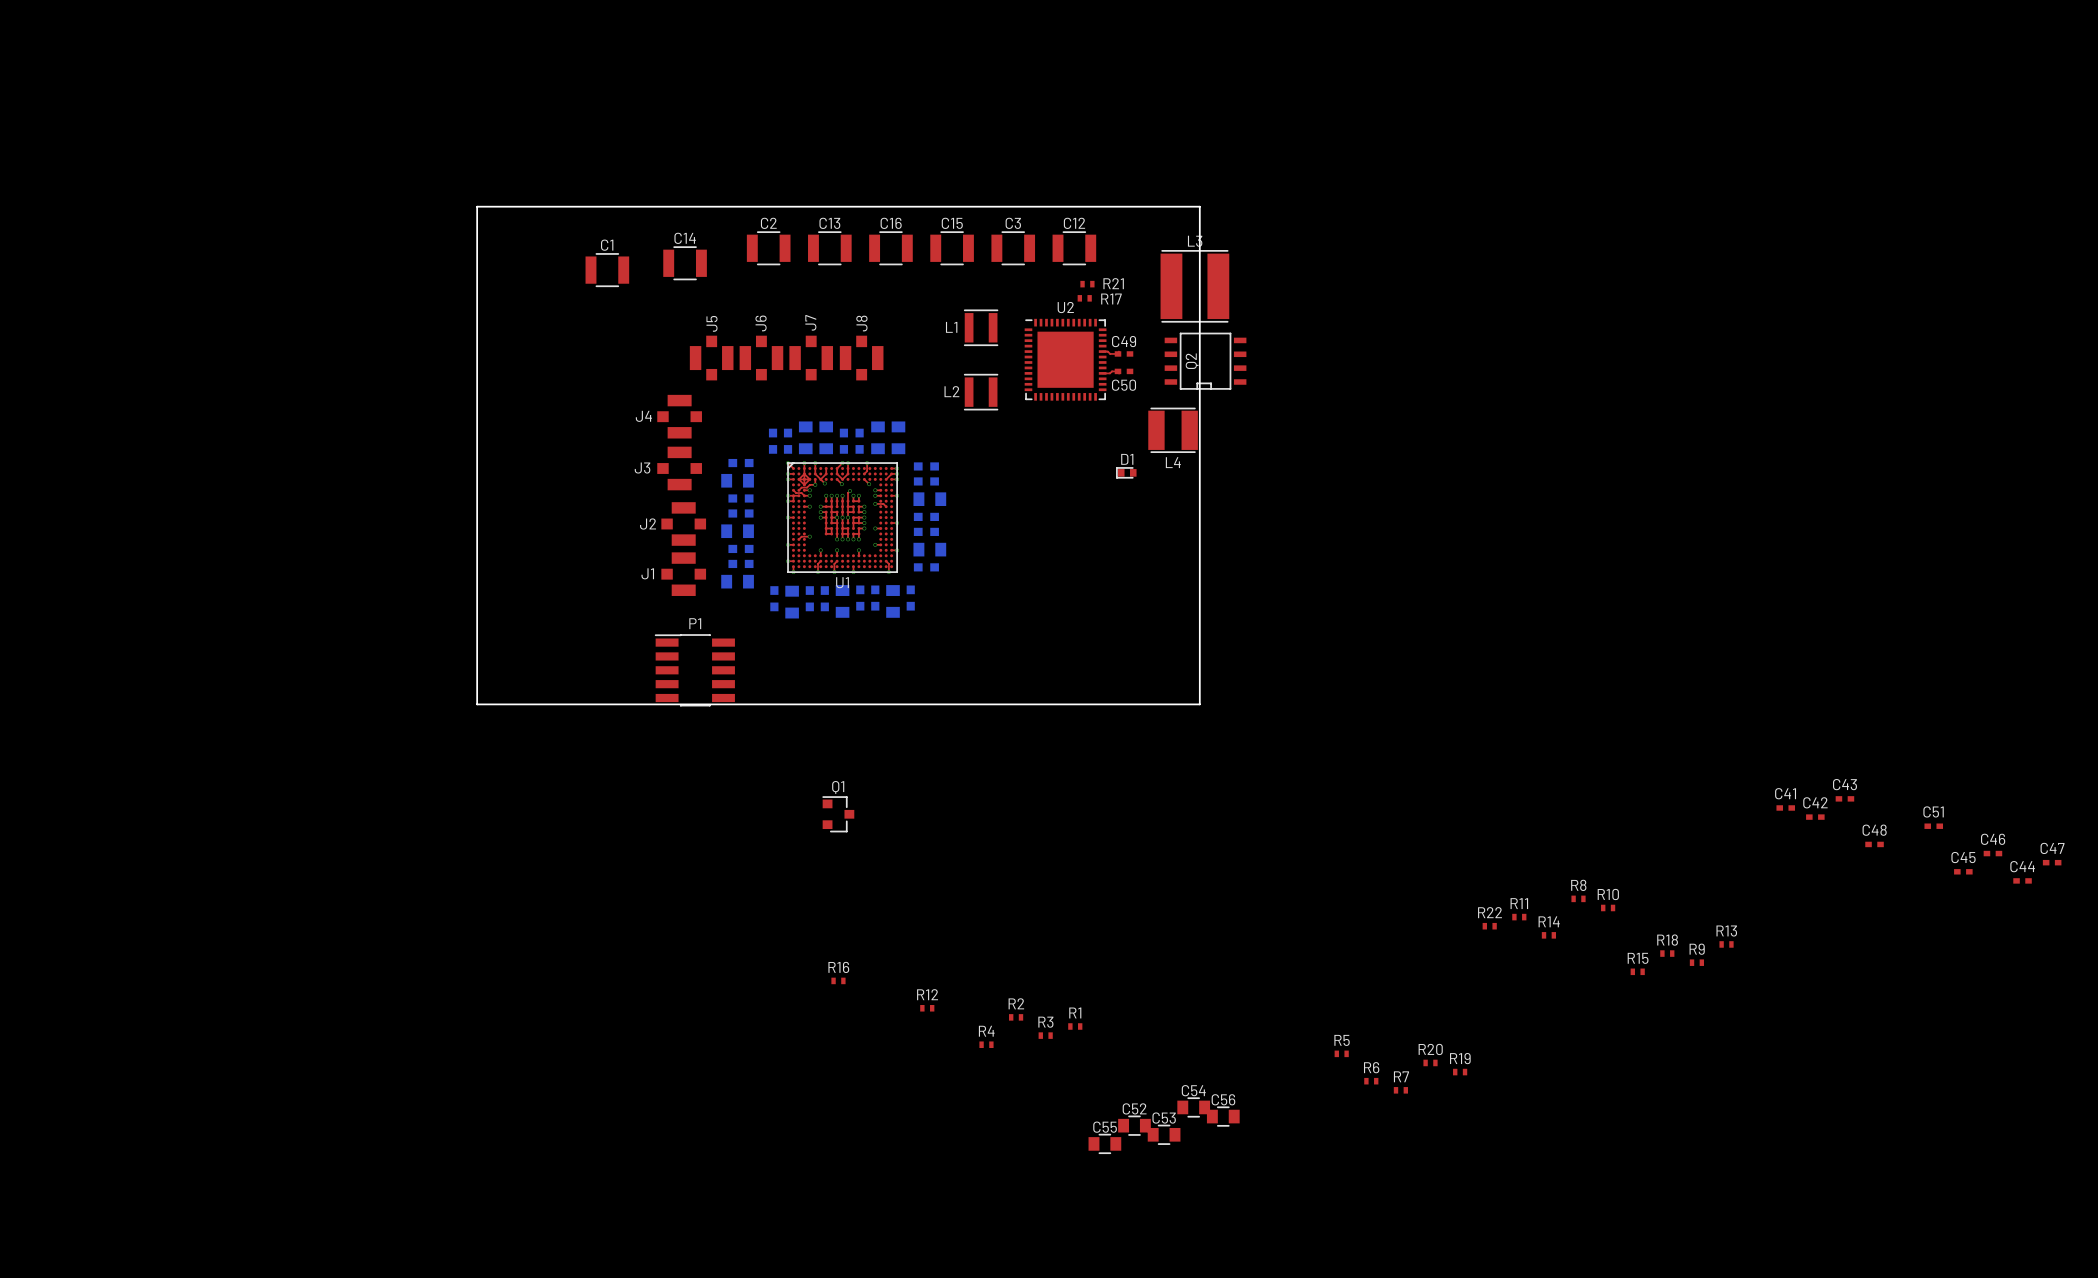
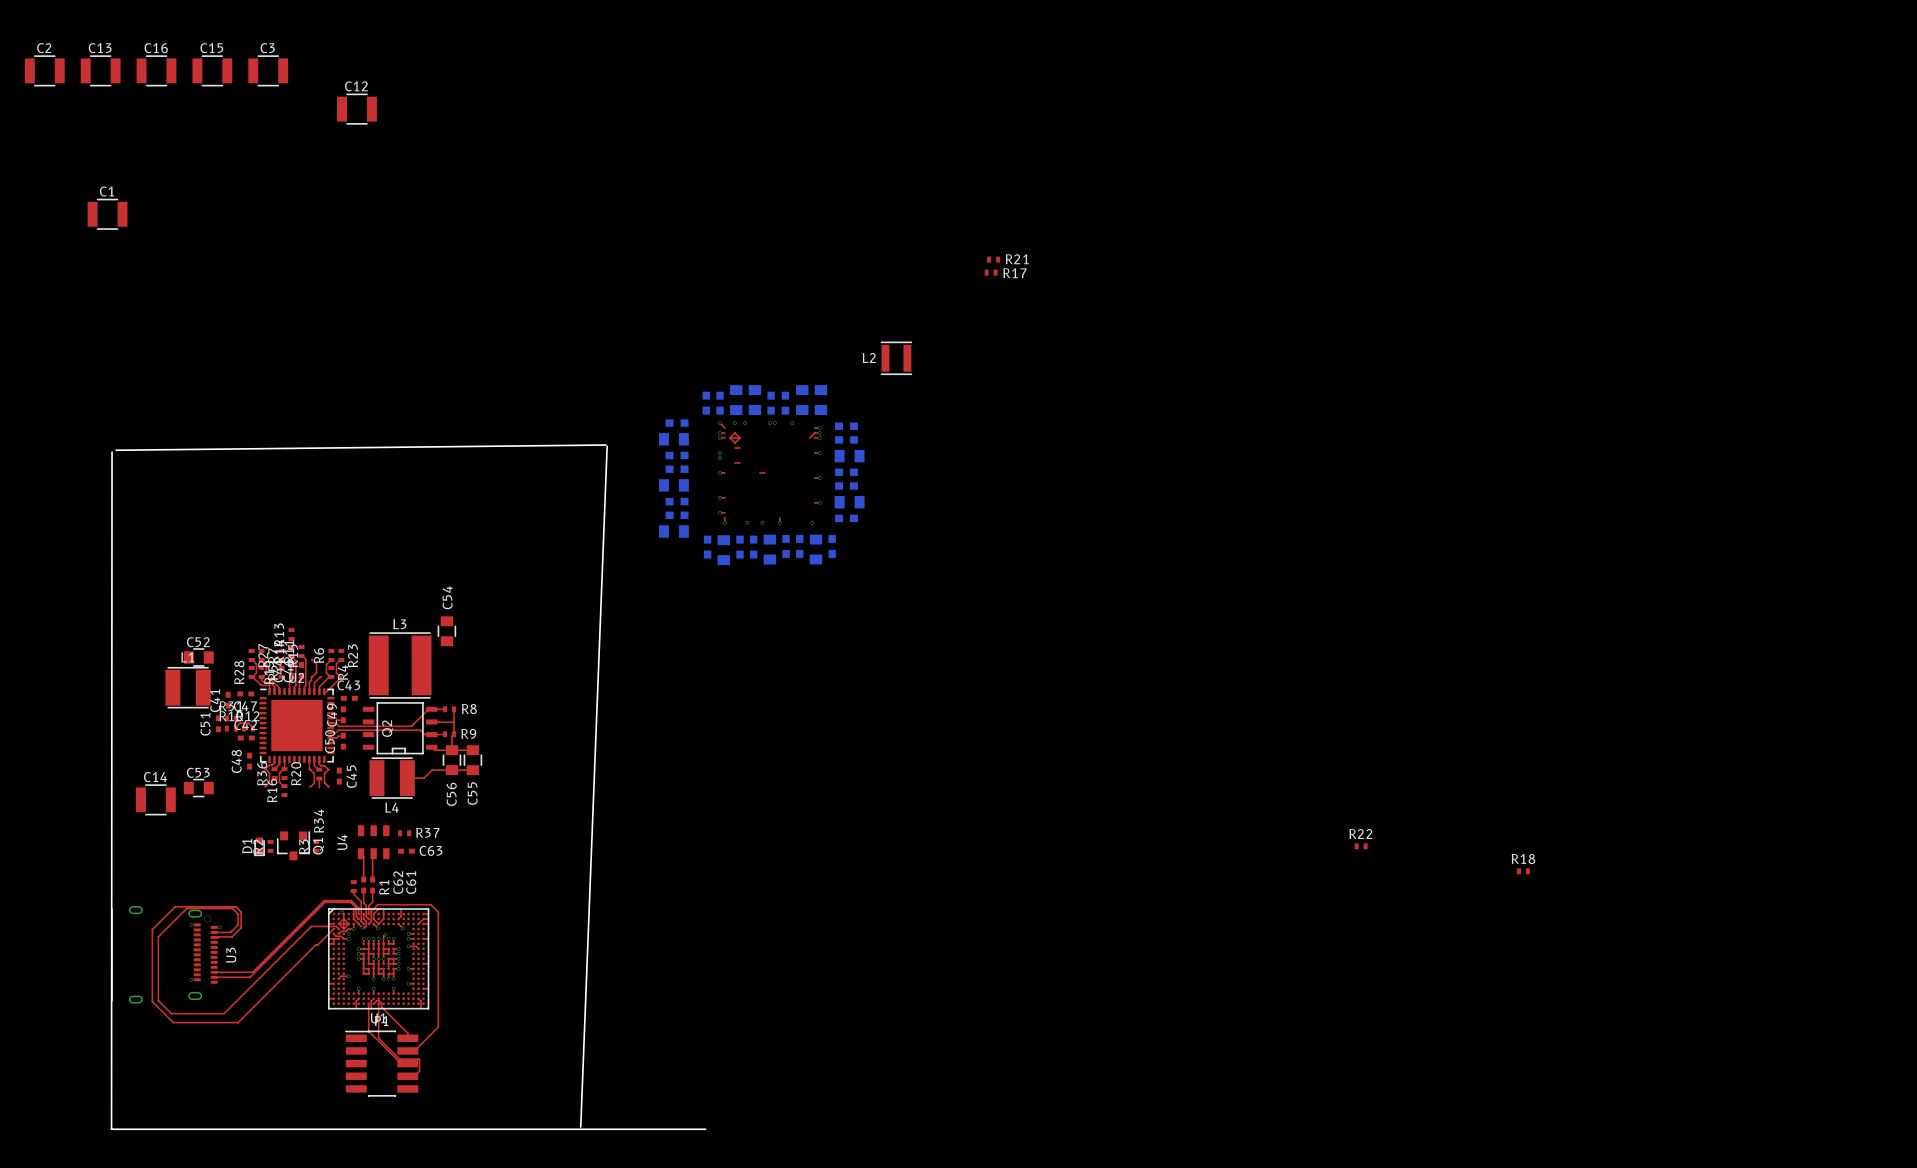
board edge: (477, 206) (1199, 206) (1199, 704) (477, 704) (477, 206) -> none
C2 position: (768, 248) -> (44, 70)
C13 position: (829, 248) -> (100, 70)
C16 position: (890, 248) -> (156, 70)
C15 position: (952, 248) -> (212, 70)
C3 position: (1013, 248) -> (268, 70)
C12 position: (1074, 248) -> (356, 109)
C14 position: (685, 263) -> (155, 799)
C1 position: (607, 270) -> (107, 214)
L3 position: (1194, 286) -> (400, 665)
L1 footprint: [963, 309, 999, 347] -> [165, 667, 211, 709]
L1 name position: L1 (951, 327) -> L1 (187, 657)
top track: (1102, 351) (1118, 353) -> none
top track: (1118, 351) (1119, 351) -> none
C49 rotation: 0° (1124, 353) -> 90° clockwise (343, 714)
C49 position: (1124, 353) -> (343, 714)
J5: (711, 358) -> none
J6: (761, 358) -> none
J7: (811, 358) -> none
J8: (861, 358) -> none
U2 position: (1065, 359) -> (296, 725)
Q2 position: (1205, 361) -> (400, 728)
top track: (1118, 371) (1102, 373) -> none
C50 rotation: 0° (1124, 371) -> 90° clockwise (343, 741)
C50 position: (1124, 371) -> (343, 741)
J4: (679, 416) -> none
L4 position: (1173, 430) -> (392, 778)
top track: (804, 463) (804, 484) -> none
top track: (815, 463) (815, 473) (824, 483) -> none
top track: (842, 463) (837, 468) (837, 473) (842, 479) (848, 473) (848, 463) -> none
top track: (867, 463) (867, 471) (864, 473) -> none
J3: (679, 468) -> none
top track: (826, 468) (826, 473) (820, 479) -> none
D1 rotation: 0° (1126, 472) -> 90° counterclockwise (259, 846)
D1 position: (1126, 472) -> (259, 846)
top track: (815, 479) (815, 484) (809, 484) (798, 490) -> none
top track: (837, 479) (841, 484) -> none
top track: (864, 479) (869, 484) -> none
via: (824, 483) -> none
via: (815, 484) -> none
via: (841, 484) -> none
via: (869, 484) -> none
board edge: none -> (605, 445) (116, 450)
board edge: none -> (607, 446) (580, 1127)
top track: (793, 490) (796, 493) (809, 495) -> none
via: (809, 490) -> none
top track: (850, 490) (848, 493) (848, 523) -> none
via: (850, 490) -> none
top track: (875, 490) (880, 490) -> none
via: (875, 490) -> none
board edge: none -> (112, 452) (111, 1129) (705, 1129)
top track: (788, 495) (798, 495) -> none
top track: (793, 495) (793, 501) (788, 501) -> none
via: (809, 495) -> none
top track: (826, 495) (826, 501) -> none
via: (826, 495) -> none
top track: (831, 495) (831, 523) (837, 523) -> none
via: (831, 495) -> none
top track: (837, 495) (837, 506) -> none
via: (837, 495) -> none
top track: (842, 495) (842, 539) -> none
via: (842, 495) -> none
top track: (853, 495) (853, 501) (858, 501) (858, 495) -> none
via: (853, 495) -> none
via: (858, 495) -> none
top track: (875, 495) (880, 495) -> none
via: (875, 495) -> none
top track: (875, 503) (883, 503) (886, 506) -> none
via: (875, 503) -> none
via: (809, 506) -> none
top track: (820, 506) (831, 506) -> none
via: (820, 506) -> none
top track: (848, 506) (853, 506) (853, 512) (848, 512) -> none
top track: (864, 506) (858, 506) (858, 512) (864, 512) -> none
via: (864, 506) -> none
top track: (820, 512) (826, 512) (826, 533) (831, 533) (831, 528) (826, 528) -> none
via: (820, 512) -> none
top track: (831, 512) (837, 512) (837, 539) -> none
via: (864, 512) -> none
top track: (820, 517) (826, 517) -> none
via: (820, 517) -> none
via: (837, 517) -> none
U1 position: (842, 517) -> (378, 958)
via: (842, 517) -> none
via: (848, 517) -> none
top track: (858, 517) (858, 523) -> none
top track: (864, 517) (853, 517) (853, 528) -> none
via: (864, 517) -> none
J2: (683, 523) -> none
top track: (853, 523) (864, 523) -> none
via: (864, 523) -> none
top track: (842, 528) (848, 528) (848, 539) -> none
top track: (864, 528) (858, 528) (858, 539) -> none
via: (864, 528) -> none
top track: (875, 528) (880, 528) -> none
via: (875, 528) -> none
top track: (842, 533) (848, 533) -> none
top track: (858, 533) (853, 533) (853, 539) -> none
top track: (809, 536) (801, 536) (798, 539) -> none
via: (809, 536) -> none
via: (837, 539) -> none
via: (842, 539) -> none
via: (848, 539) -> none
via: (853, 539) -> none
via: (858, 539) -> none
top track: (875, 544) (880, 544) -> none
via: (875, 544) -> none
top track: (820, 550) (820, 555) -> none
via: (820, 550) -> none
top track: (837, 550) (837, 555) -> none
via: (837, 550) -> none
top track: (858, 550) (858, 555) -> none
via: (858, 550) -> none
top track: (820, 561) (818, 563) (818, 572) -> none
top track: (837, 561) (834, 563) (834, 572) -> none
top track: (886, 561) (888, 563) (888, 572) -> none
J1: (683, 574) -> none
P1 position: (694, 670) -> (381, 1063)
R27: none -> (251, 655)
top track: none -> (291, 655) (295, 660) (294, 691)
top track: none -> (301, 655) (305, 659) (304, 691)
R23: none -> (341, 655)
top track: none -> (251, 659) (256, 664) (256, 673) (252, 676)
top track: none -> (261, 659) (266, 663) (266, 673) (261, 676) (261, 680) (263, 682) (270, 682) (274, 686) (274, 691)
top track: none -> (311, 659) (316, 664) (316, 672) (311, 676) (309, 682) (309, 691)
top track: none -> (331, 659) (326, 664) (326, 673) (330, 676)
top track: none -> (341, 659) (336, 663) (336, 673) (341, 677) (326, 691) (324, 691)
R28: none -> (251, 672)
top track: none -> (291, 675) (289, 691)
top track: none -> (301, 675) (299, 691)
top track: none -> (252, 676) (261, 685) (269, 685) (269, 691)
top track: none -> (271, 676) (271, 680) (279, 688) (279, 691)
top track: none -> (321, 676) (314, 682) (314, 691)
top track: none -> (331, 676) (319, 686) (319, 691)
top track: none -> (453, 708) (451, 750)
top track: none -> (444, 709) (428, 709) (411, 726) (338, 726) (335, 723) (330, 723)
top track: none -> (330, 718) (343, 720)
R31: none -> (231, 718)
top track: none -> (431, 721) (453, 722)
top track: none -> (235, 728) (240, 723) (248, 723) (252, 728)
C43 position: (1844, 798) -> (349, 698)
top track: none -> (330, 733) (335, 733) (338, 730) (420, 730) (424, 734) (445, 734)
top track: none -> (343, 736) (330, 738)
C41 rotation: 0° (1785, 807) -> 90° clockwise (228, 700)
C41 position: (1785, 807) -> (228, 700)
Q1 rotation: 0° (838, 814) -> 90° clockwise (293, 845)
Q1 position: (838, 814) -> (293, 845)
top track: none -> (431, 747) (434, 750) (472, 750)
C42 position: (1815, 817) -> (246, 738)
C51 rotation: 0° (1933, 826) -> 90° clockwise (218, 723)
C51 position: (1933, 826) -> (218, 723)
top track: none -> (274, 759) (271, 765) (264, 769)
top track: none -> (279, 759) (279, 764) (274, 769)
top track: none -> (284, 759) (284, 769) (279, 773) (279, 781) (284, 786)
top track: none -> (309, 759) (309, 769) (314, 773) (314, 783) (309, 786)
top track: none -> (314, 759) (314, 765) (319, 769)
top track: none -> (319, 759) (319, 764) (328, 769)
top track: none -> (264, 769) (269, 772) (269, 782) (264, 786)
top track: none -> (328, 769) (329, 769)
top track: none -> (328, 769) (324, 773) (324, 782) (329, 786)
top track: none -> (472, 770) (432, 770) (424, 778) (407, 778)
C48 rotation: 0° (1874, 844) -> 90° clockwise (249, 761)
C48 position: (1874, 844) -> (249, 761)
R36: none -> (274, 773)
R34: none -> (319, 774)
C47 name position: C47 (2052, 848) -> C47 (245, 706)
top track: none -> (319, 778) (319, 787)
C46 rotation: 0° (1992, 853) -> 90° clockwise (301, 670)
C46 position: (1992, 853) -> (301, 670)
C47 position: (2052, 862) -> (245, 693)
C45 rotation: 0° (1963, 871) -> 90° clockwise (339, 776)
C45 position: (1963, 871) -> (339, 776)
C44 rotation: 0° (2022, 880) -> 90° clockwise (291, 670)
C44 position: (2022, 880) -> (291, 670)
R8 name position: R8 (1578, 885) -> R8 (469, 709)
R8 position: (1578, 898) -> (449, 709)
R10 position: (1608, 907) -> (231, 728)
R37: none -> (404, 833)
R11 rotation: 0° (1519, 917) -> 90° clockwise (301, 651)
R11 position: (1519, 917) -> (301, 651)
U4: none -> (373, 842)
C63: none -> (406, 851)
top track: none -> (361, 853) (363, 856) (363, 879)
top track: none -> (373, 853) (372, 879)
R14 rotation: 0° (1548, 935) -> 90° clockwise (291, 651)
R14 position: (1548, 935) -> (291, 651)
R13 rotation: 0° (1726, 944) -> 90° clockwise (291, 634)
R13 position: (1726, 944) -> (291, 634)
R9 name position: R9 (1697, 949) -> R9 (468, 733)
R9 position: (1696, 962) -> (449, 734)
C62: none -> (363, 885)
C61: none -> (372, 885)
R15 rotation: 0° (1637, 971) -> 90° clockwise (281, 655)
R15 position: (1637, 971) -> (281, 655)
top track: none -> (363, 890) (363, 903) (366, 905) (366, 916) (368, 918)
top track: none -> (372, 890) (372, 902) (368, 906) (368, 913)
top track: none -> (353, 891) (353, 894) (361, 901) (361, 921) (363, 923)
R16 rotation: 0° (838, 980) -> 90° clockwise (284, 790)
R16 position: (838, 980) -> (284, 790)
top track: none -> (352, 908) (353, 918) (362, 927) (364, 927) (366, 921) (363, 918) (363, 913)
top track: none -> (378, 908) (373, 913) (373, 918) (378, 923) (383, 918) (383, 908)
top track: none -> (401, 908) (401, 916) (398, 918)
top track: none -> (342, 912) (343, 928)
via: none -> (342, 912)
top track: none -> (358, 913) (358, 907) (351, 900) (324, 900) (252, 972) (214, 972)
top track: none -> (423, 913) (428, 913)
top track: none -> (358, 918) (356, 916) (356, 907) (350, 902) (325, 902) (250, 977) (214, 977)
top track: none -> (428, 918) (423, 918) (418, 923)
R12 position: (927, 1008) -> (248, 728)
top track: none -> (328, 923) (333, 923)
top track: none -> (338, 923) (348, 923)
top track: none -> (338, 923) (343, 918) (348, 923)
top track: none -> (338, 923) (343, 928)
top track: none -> (348, 923) (343, 928)
top track: none -> (353, 923) (353, 928) (348, 928) (338, 933)
top track: none -> (368, 923) (371, 921) (371, 911) (377, 904) (430, 904) (438, 912) (438, 1027) (414, 1050) (407, 1050)
top track: none -> (373, 923) (378, 928)
top track: none -> (398, 923) (402, 928)
top track: none -> (423, 923) (428, 923)
via: none -> (191, 924)
via: none -> (219, 927)
via: none -> (362, 927)
via: none -> (378, 928)
via: none -> (402, 928)
top track: none -> (333, 928) (238, 1022) (173, 1022) (152, 1001) (152, 929) (175, 906) (235, 906) (241, 911) (241, 927) (232, 936) (214, 937)
top track: none -> (338, 928) (336, 926) (311, 926) (224, 1013) (171, 1013) (158, 1000) (158, 936) (186, 908) (232, 908) (238, 913) (238, 924) (230, 932) (214, 932)
via: none -> (353, 928)
R2 rotation: 0° (1016, 1017) -> 90° clockwise (270, 846)
R2 position: (1016, 1017) -> (270, 846)
top track: none -> (333, 933) (336, 936) (348, 938)
via: none -> (348, 933)
top track: none -> (385, 934) (383, 936) (383, 963)
via: none -> (385, 934)
top track: none -> (408, 933) (413, 933)
via: none -> (408, 933)
R1 rotation: 0° (1075, 1026) -> 90° clockwise (353, 886)
R1 position: (1075, 1026) -> (353, 886)
top track: none -> (328, 938) (338, 938)
top track: none -> (333, 938) (333, 943) (328, 943)
via: none -> (348, 938)
top track: none -> (363, 938) (363, 943)
via: none -> (363, 938)
top track: none -> (368, 938) (368, 963) (373, 963)
via: none -> (368, 938)
top track: none -> (373, 938) (373, 948)
via: none -> (373, 938)
top track: none -> (378, 938) (378, 973) (383, 973)
via: none -> (378, 938)
top track: none -> (388, 938) (388, 943) (393, 943) (393, 938)
via: none -> (388, 938)
via: none -> (393, 938)
top track: none -> (408, 938) (413, 938)
via: none -> (408, 938)
top track: none -> (423, 938) (428, 938)
top track: none -> (408, 946) (416, 946) (418, 948)
via: none -> (408, 946)
R3 rotation: 0° (1045, 1035) -> 90° clockwise (316, 846)
R3 position: (1045, 1035) -> (316, 846)
top track: none -> (358, 948) (368, 948)
via: none -> (358, 948)
top track: none -> (383, 948) (388, 948) (388, 953) (383, 953)
top track: none -> (398, 948) (393, 948) (393, 953) (398, 953)
via: none -> (398, 948)
top track: none -> (358, 953) (363, 953) (363, 973) (368, 973) (368, 968) (363, 968)
via: none -> (358, 953)
top track: none -> (368, 953) (373, 953) (373, 978)
via: none -> (398, 953)
R4 rotation: 0° (986, 1044) -> 90° clockwise (331, 672)
R4 position: (986, 1044) -> (331, 672)
U3: none -> (164, 954)
top track: none -> (328, 958) (333, 958)
top track: none -> (358, 958) (363, 958)
via: none -> (358, 958)
via: none -> (373, 958)
via: none -> (378, 958)
via: none -> (383, 958)
top track: none -> (393, 958) (393, 963)
top track: none -> (398, 958) (388, 958) (388, 968)
via: none -> (398, 958)
R5 rotation: 0° (1341, 1053) -> 90° clockwise (261, 672)
R5 position: (1341, 1053) -> (261, 672)
top track: none -> (388, 963) (398, 963)
via: none -> (398, 963)
top track: none -> (423, 963) (428, 963)
top track: none -> (378, 968) (383, 968) (383, 978)
top track: none -> (398, 968) (393, 968) (393, 978)
via: none -> (398, 968)
top track: none -> (408, 968) (413, 968)
via: none -> (408, 968)
R20 rotation: 0° (1430, 1062) -> 90° clockwise (284, 773)
R20 position: (1430, 1062) -> (284, 773)
top track: none -> (393, 973) (388, 973) (388, 978)
top track: none -> (348, 976) (341, 976) (338, 978)
via: none -> (348, 976)
via: none -> (373, 978)
via: none -> (383, 978)
via: none -> (388, 978)
via: none -> (393, 978)
via: none -> (191, 979)
R19 rotation: 0° (1460, 1072) -> 90° clockwise (281, 672)
R19 position: (1460, 1072) -> (281, 672)
top track: none -> (328, 983) (333, 983)
top track: none -> (408, 983) (413, 983)
via: none -> (408, 983)
R6 rotation: 0° (1371, 1081) -> 90° clockwise (331, 655)
R6 position: (1371, 1081) -> (331, 655)
top track: none -> (358, 988) (358, 993)
via: none -> (358, 988)
top track: none -> (373, 988) (373, 993)
via: none -> (373, 988)
top track: none -> (393, 988) (393, 993)
via: none -> (393, 988)
top track: none -> (423, 988) (428, 988)
R7 rotation: 0° (1400, 1090) -> 90° clockwise (261, 655)
R7 position: (1400, 1090) -> (261, 655)
top track: none -> (328, 998) (333, 998)
top track: none -> (358, 998) (356, 1001) (356, 1008)
top track: none -> (373, 998) (371, 1001) (371, 1008)
top track: none -> (418, 998) (421, 1001) (421, 1008)
top track: none -> (368, 1003) (368, 1031) (401, 1063) (407, 1063)
top track: none -> (373, 1003) (376, 1000) (381, 1003) (381, 1007) (407, 1033) (407, 1038)
top track: none -> (378, 1003) (378, 1038) (399, 1059) (419, 1059) (419, 1071) (414, 1076) (407, 1076)
C56 name position: C56 (1223, 1099) -> C56 (451, 794)
C54 rotation: 0° (1193, 1107) -> 90° clockwise (446, 631)
C54 position: (1193, 1107) -> (446, 631)
C56 rotation: 0° (1223, 1116) -> 90° clockwise (451, 760)
C56 position: (1223, 1116) -> (451, 760)
C52 position: (1134, 1125) -> (198, 657)
C55 name position: C55 (1105, 1127) -> C55 (472, 793)
C53 position: (1164, 1134) -> (198, 788)
C55 rotation: 0° (1104, 1143) -> 90° clockwise (472, 760)
C55 position: (1104, 1143) -> (472, 760)

